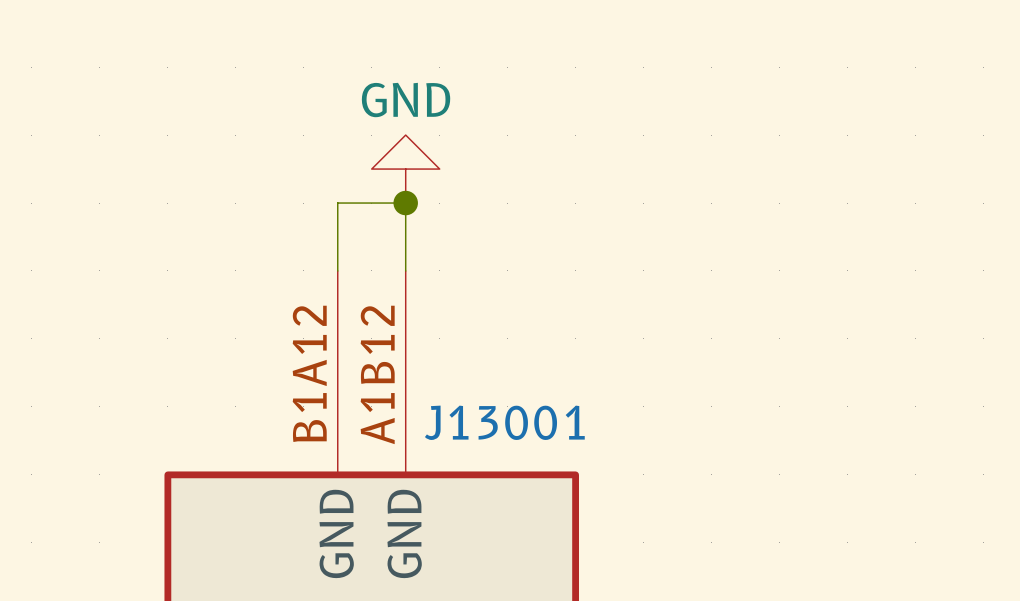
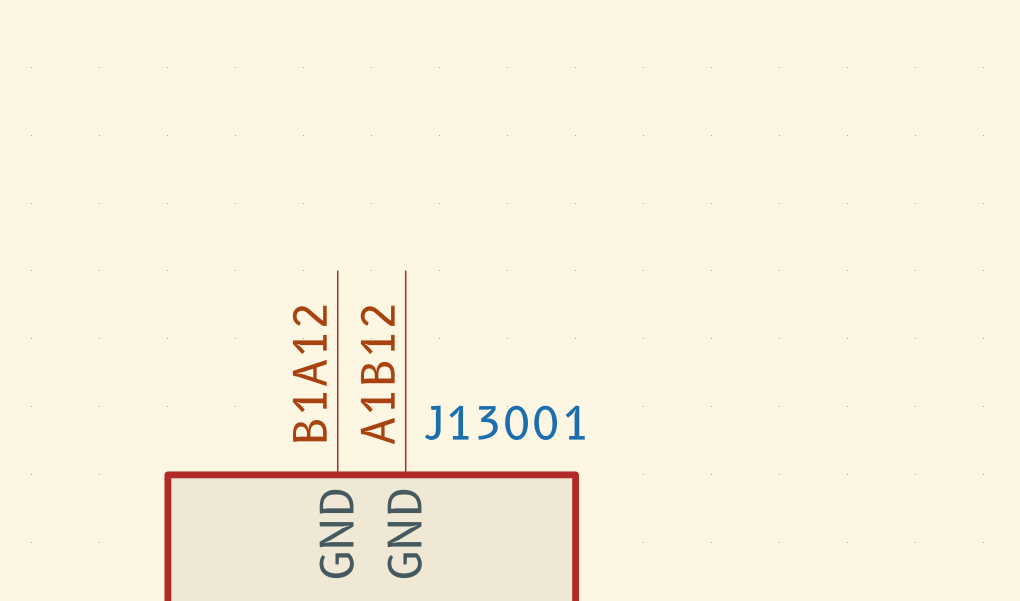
power symbol: GND (405, 169) -> none
junction: (405, 203) -> none
wire: (337, 270) (337, 203) (405, 203) (405, 270) -> none

